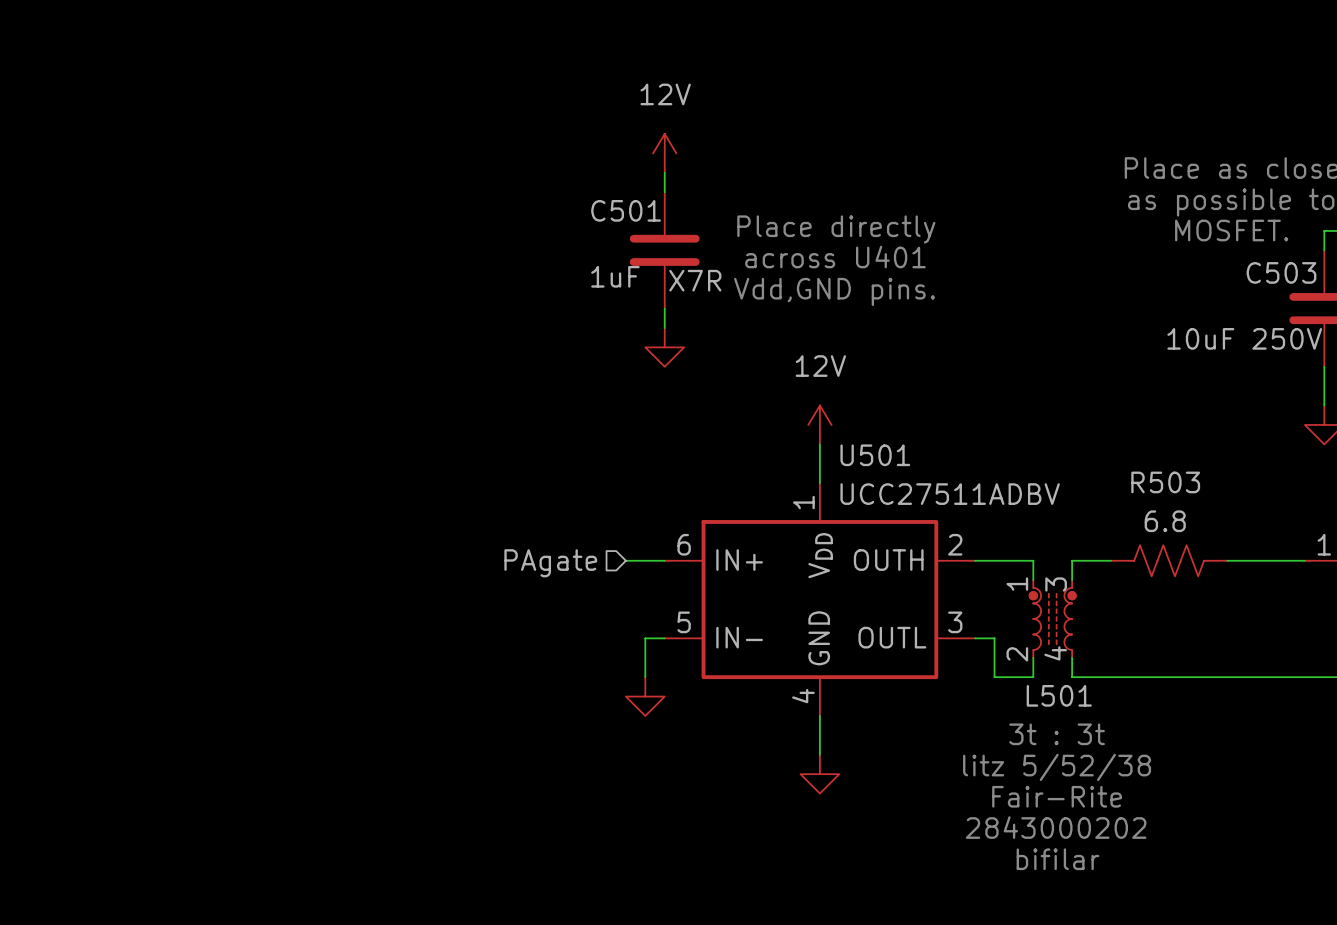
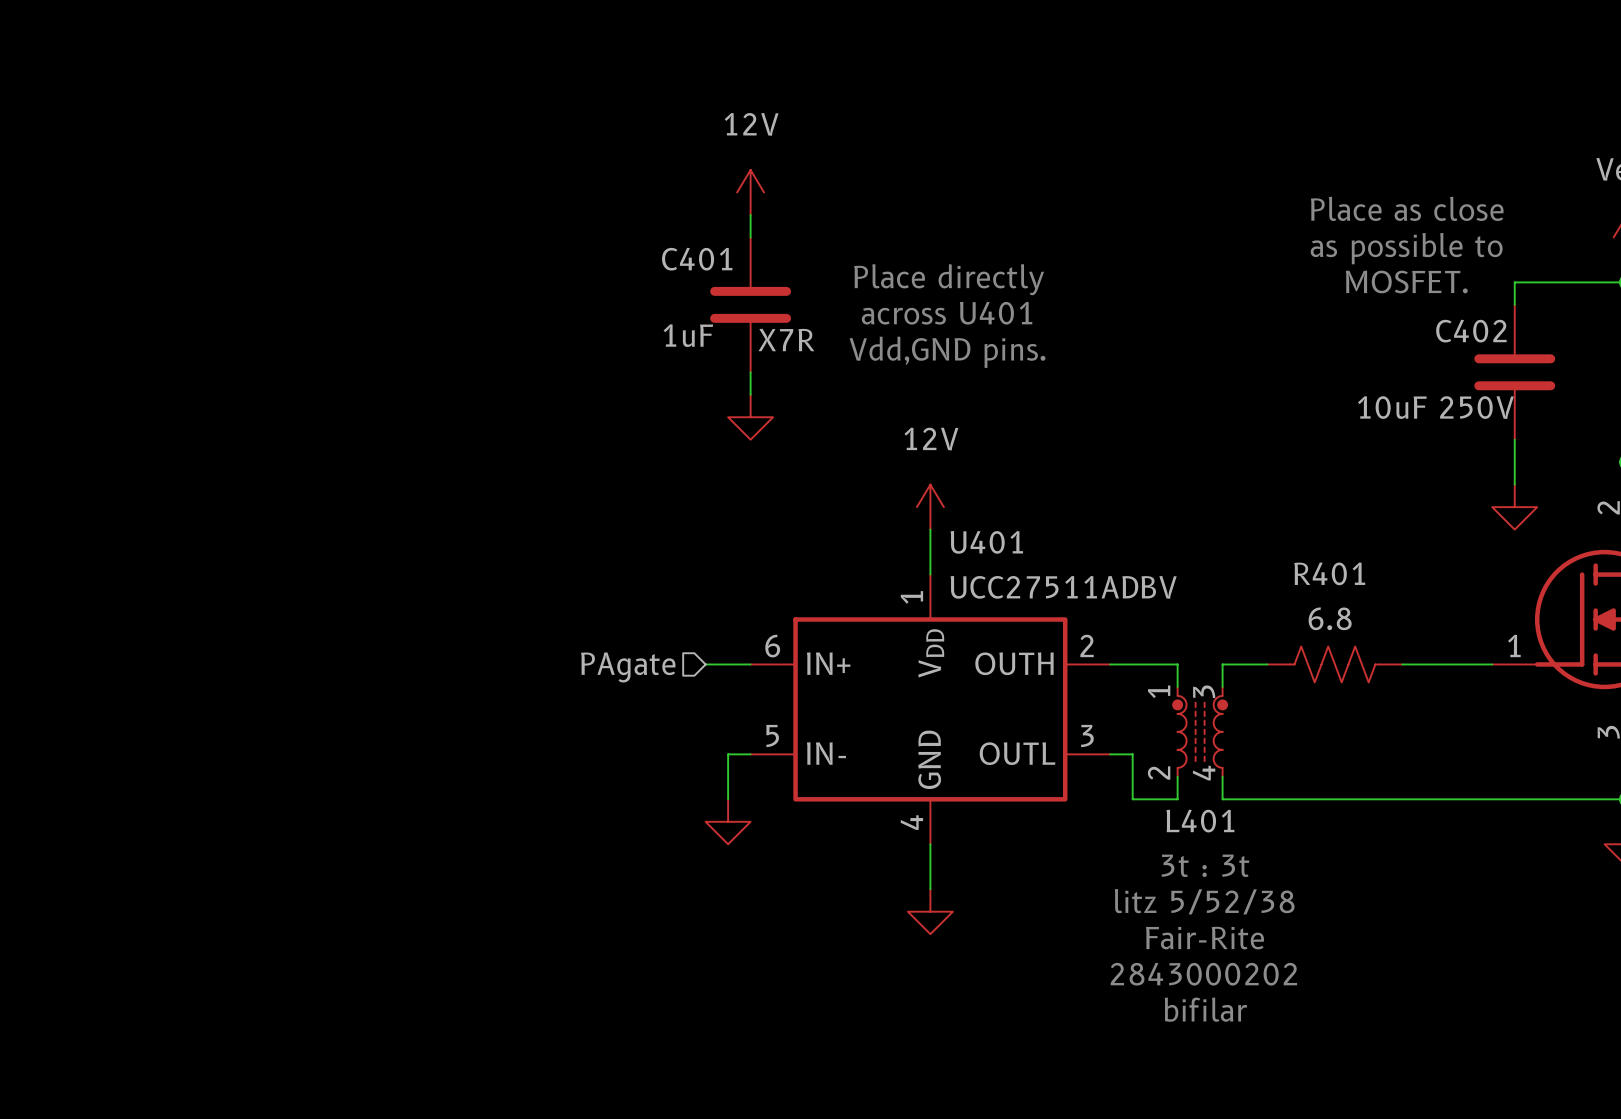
C501 name: C501 (626, 210) -> C401 (697, 259)
C503 name: C503 (1281, 272) -> C402 (1471, 331)
U501 name: U501 (875, 455) -> U401 (986, 542)
R503 name: R503 (1165, 482) -> R401 (1329, 573)
L501 name: L501 (1059, 695) -> L401 (1200, 821)

